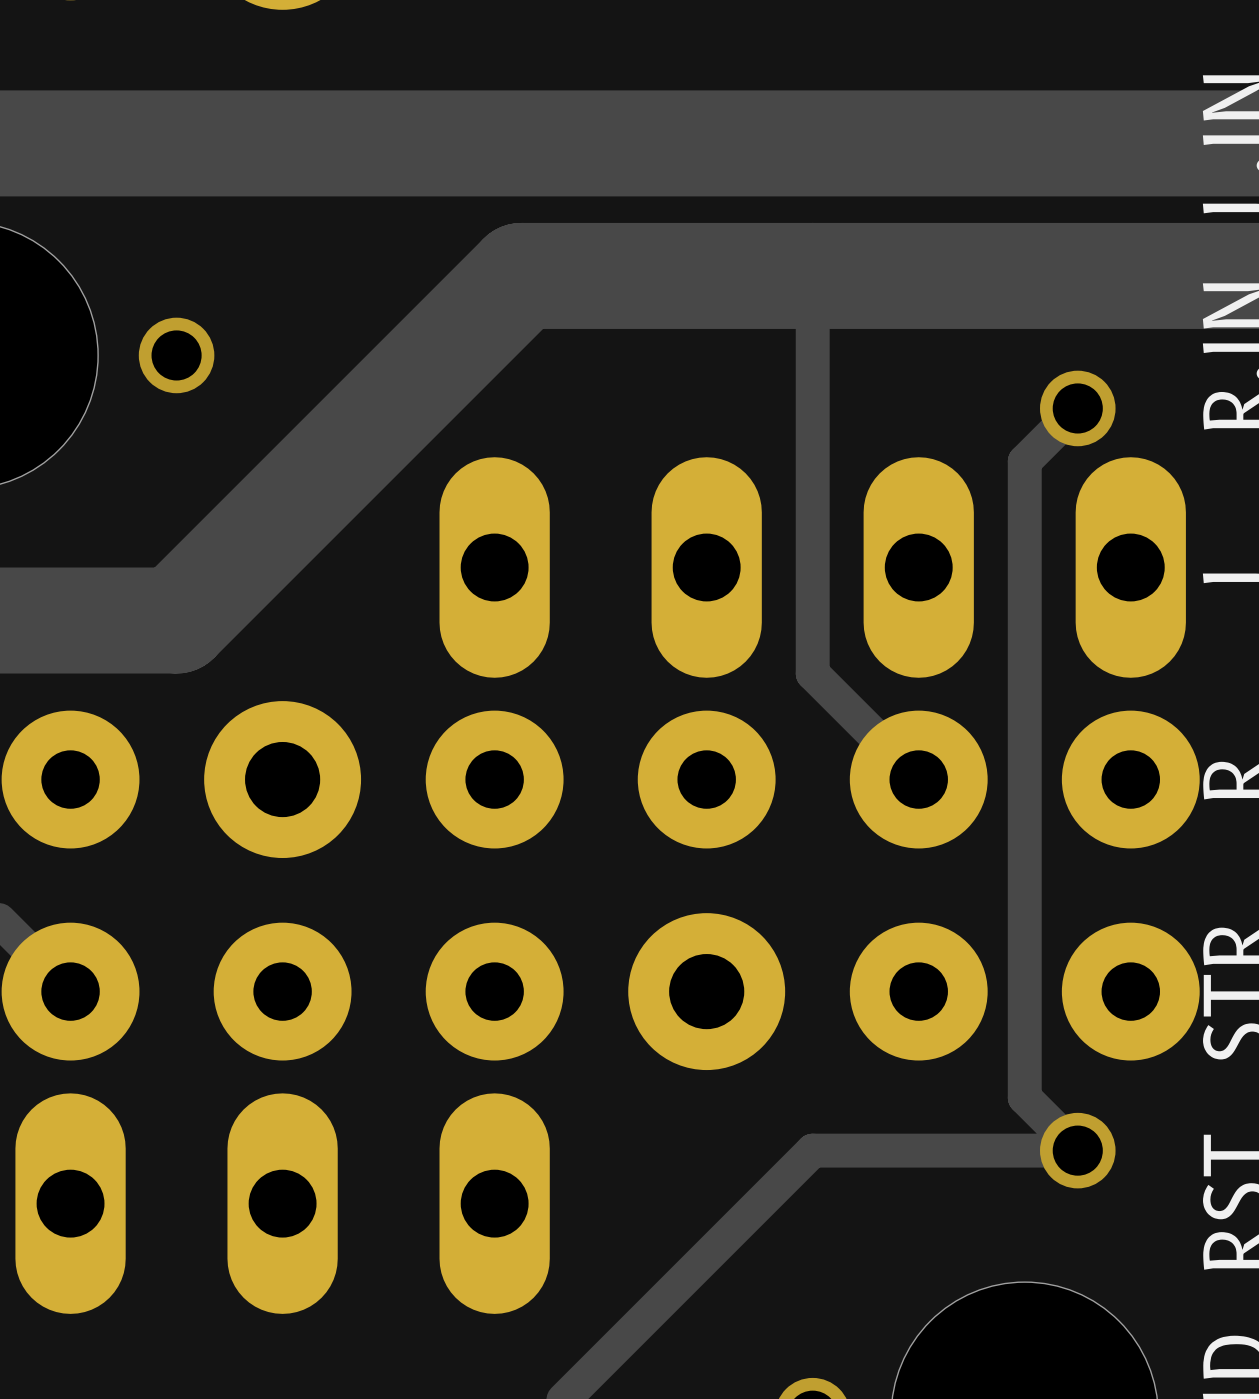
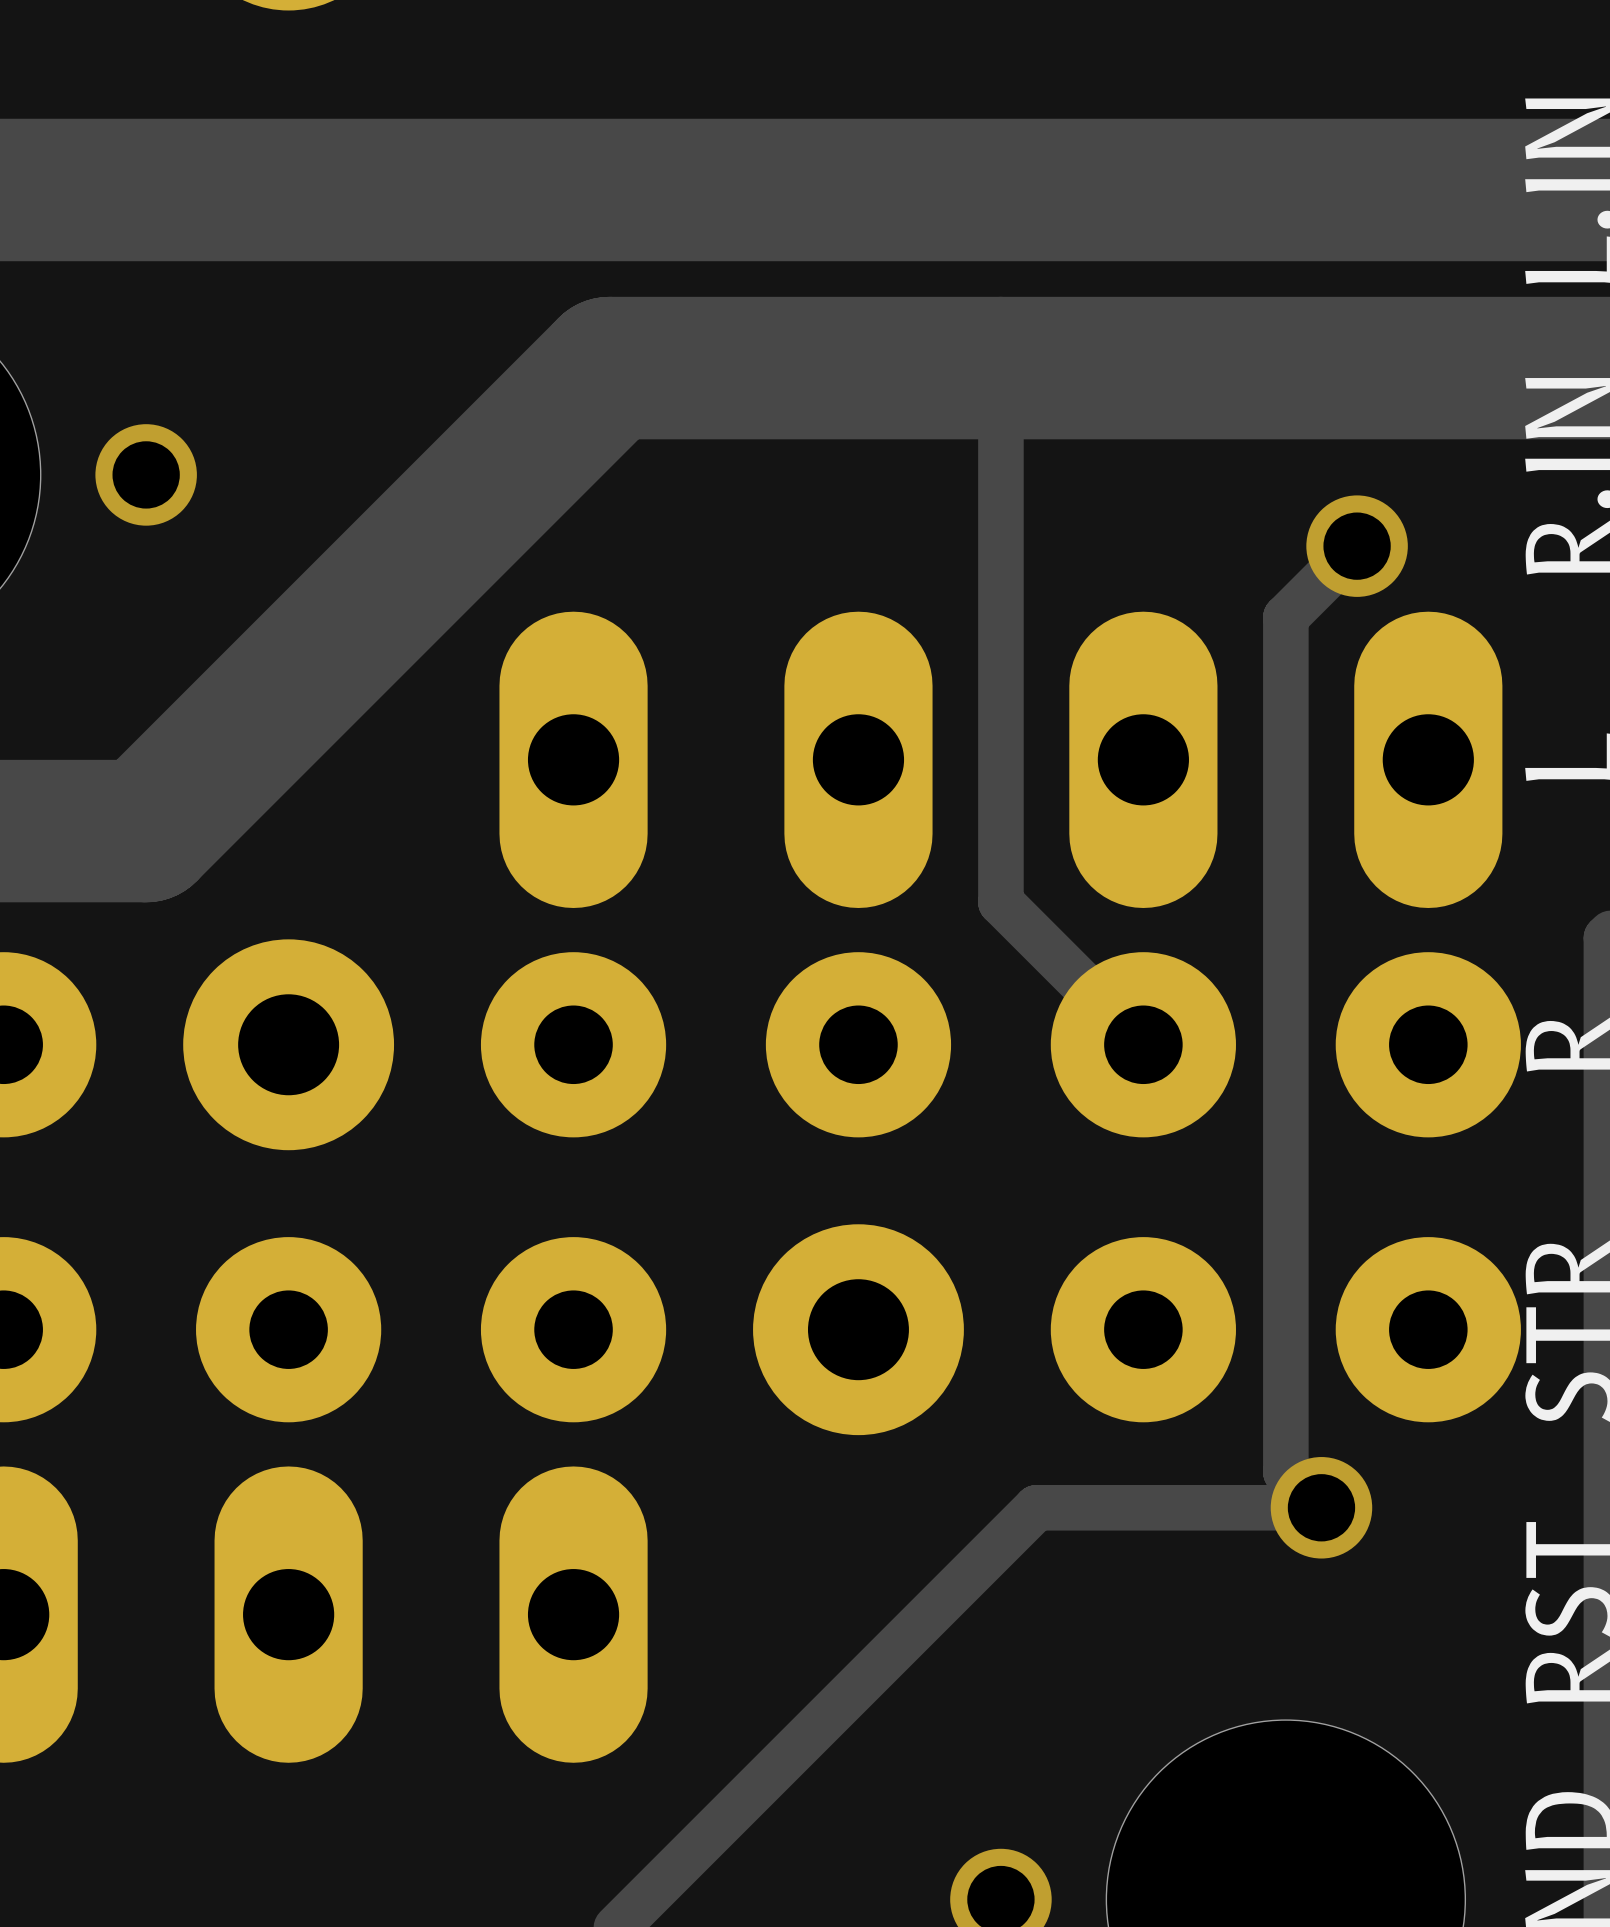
track: (1051, 1124) (1077, 1150) (812, 1150) -> (1321, 1507) (1036, 1507) (1000, 1543)
via position: (1077, 1150) -> (1321, 1507)

